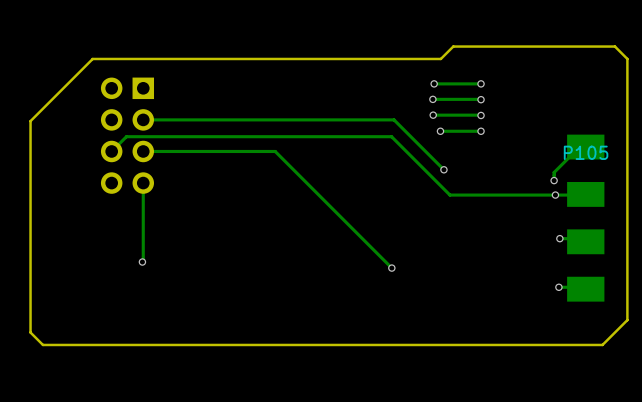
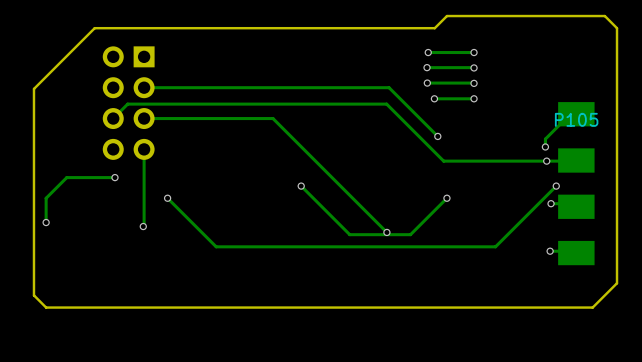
track: none -> (114, 177) (66, 177) (46, 198) (46, 222)
via: none -> (114, 177)
track: none -> (301, 186) (349, 234) (410, 234) (446, 198)
via: none -> (301, 186)
track: none -> (556, 186) (495, 246) (216, 246) (167, 198)
via: none -> (556, 186)
via: none -> (167, 198)
via: none -> (446, 198)
via: none -> (46, 222)

